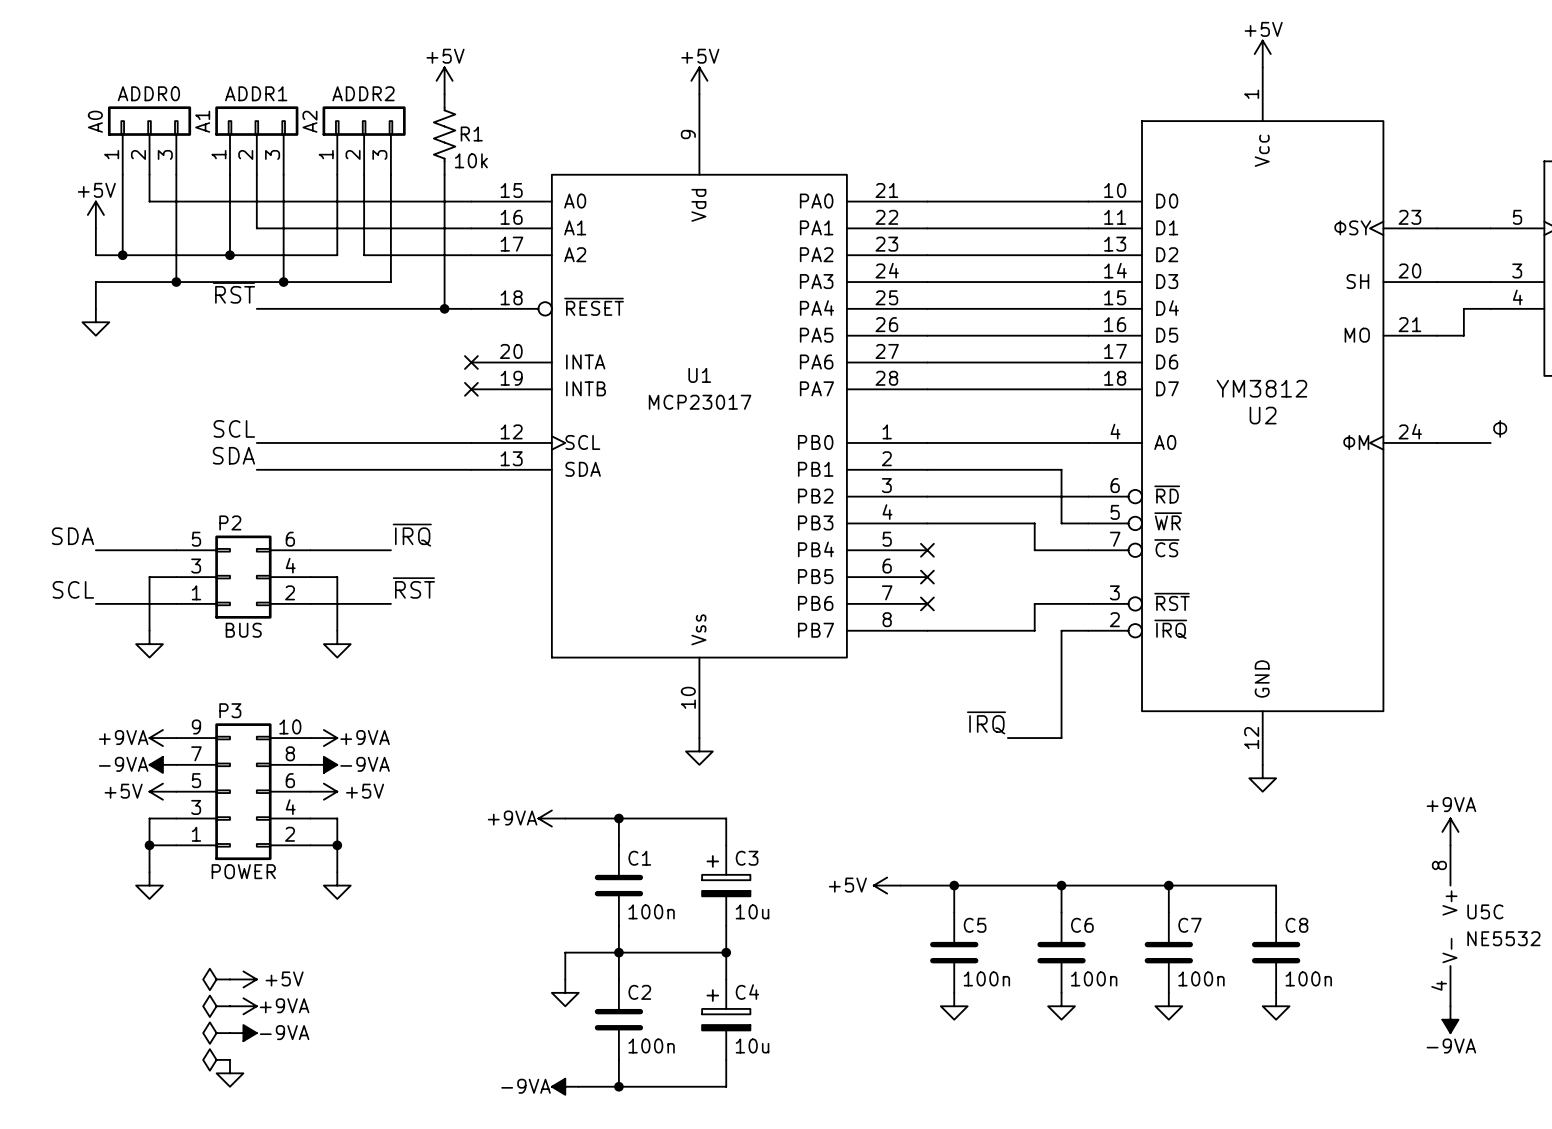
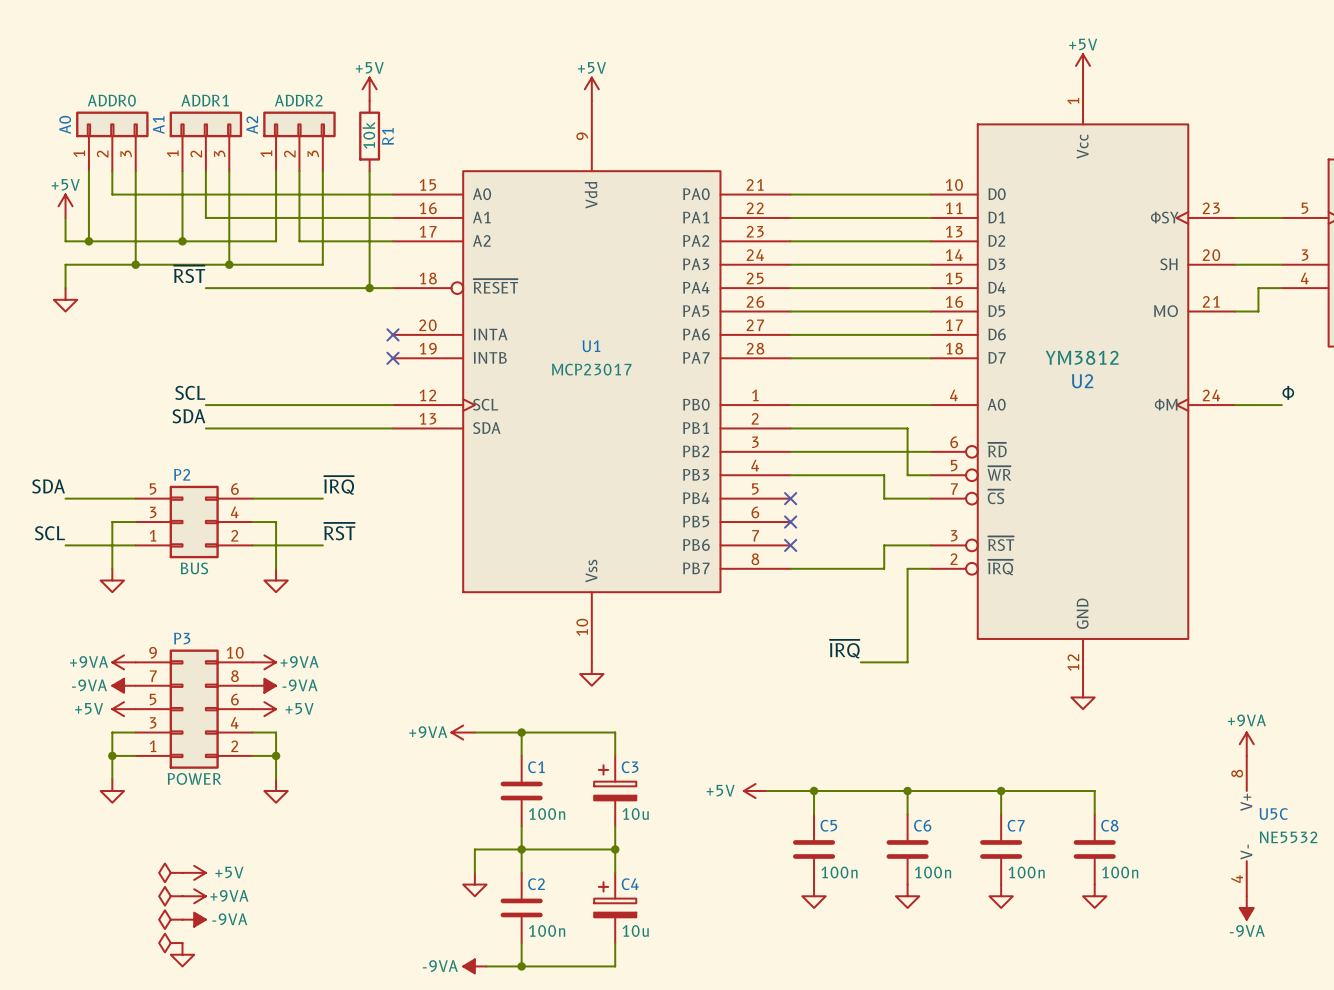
R1 symbol: [433, 94, 456, 175] -> [359, 101, 381, 172]
R1 value position: 10k (471, 160) -> 10k (368, 135)

